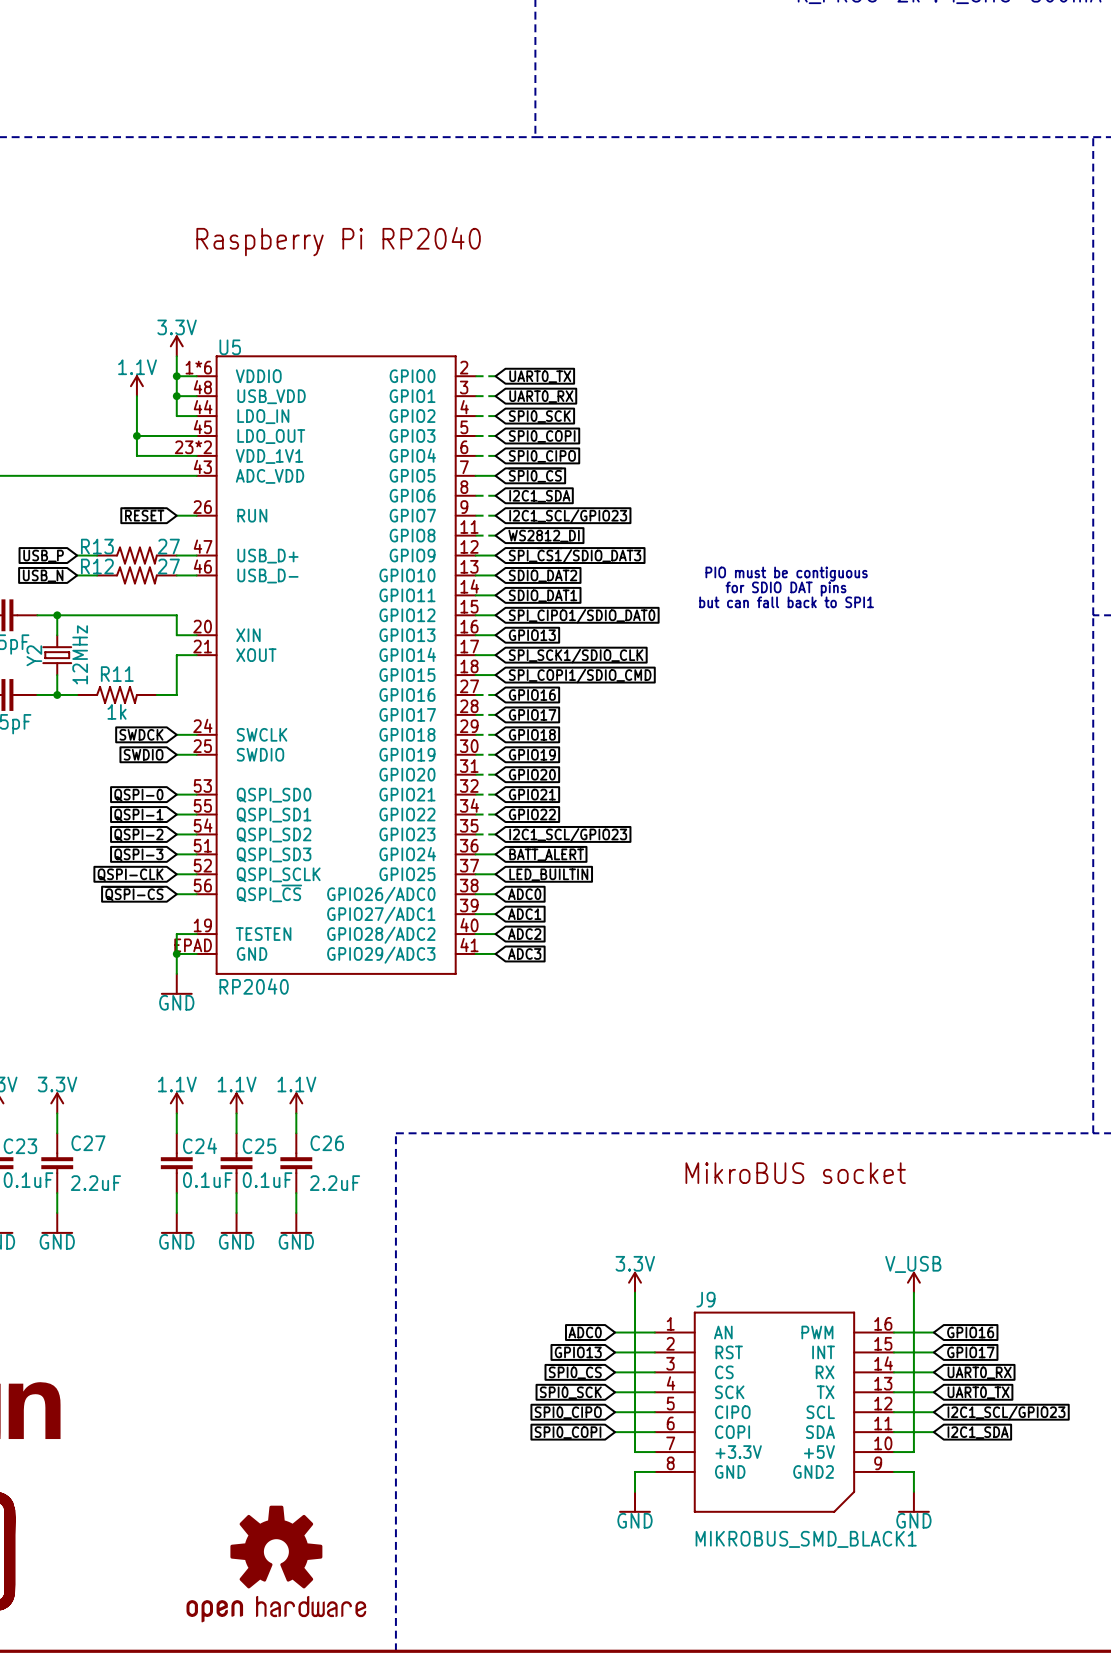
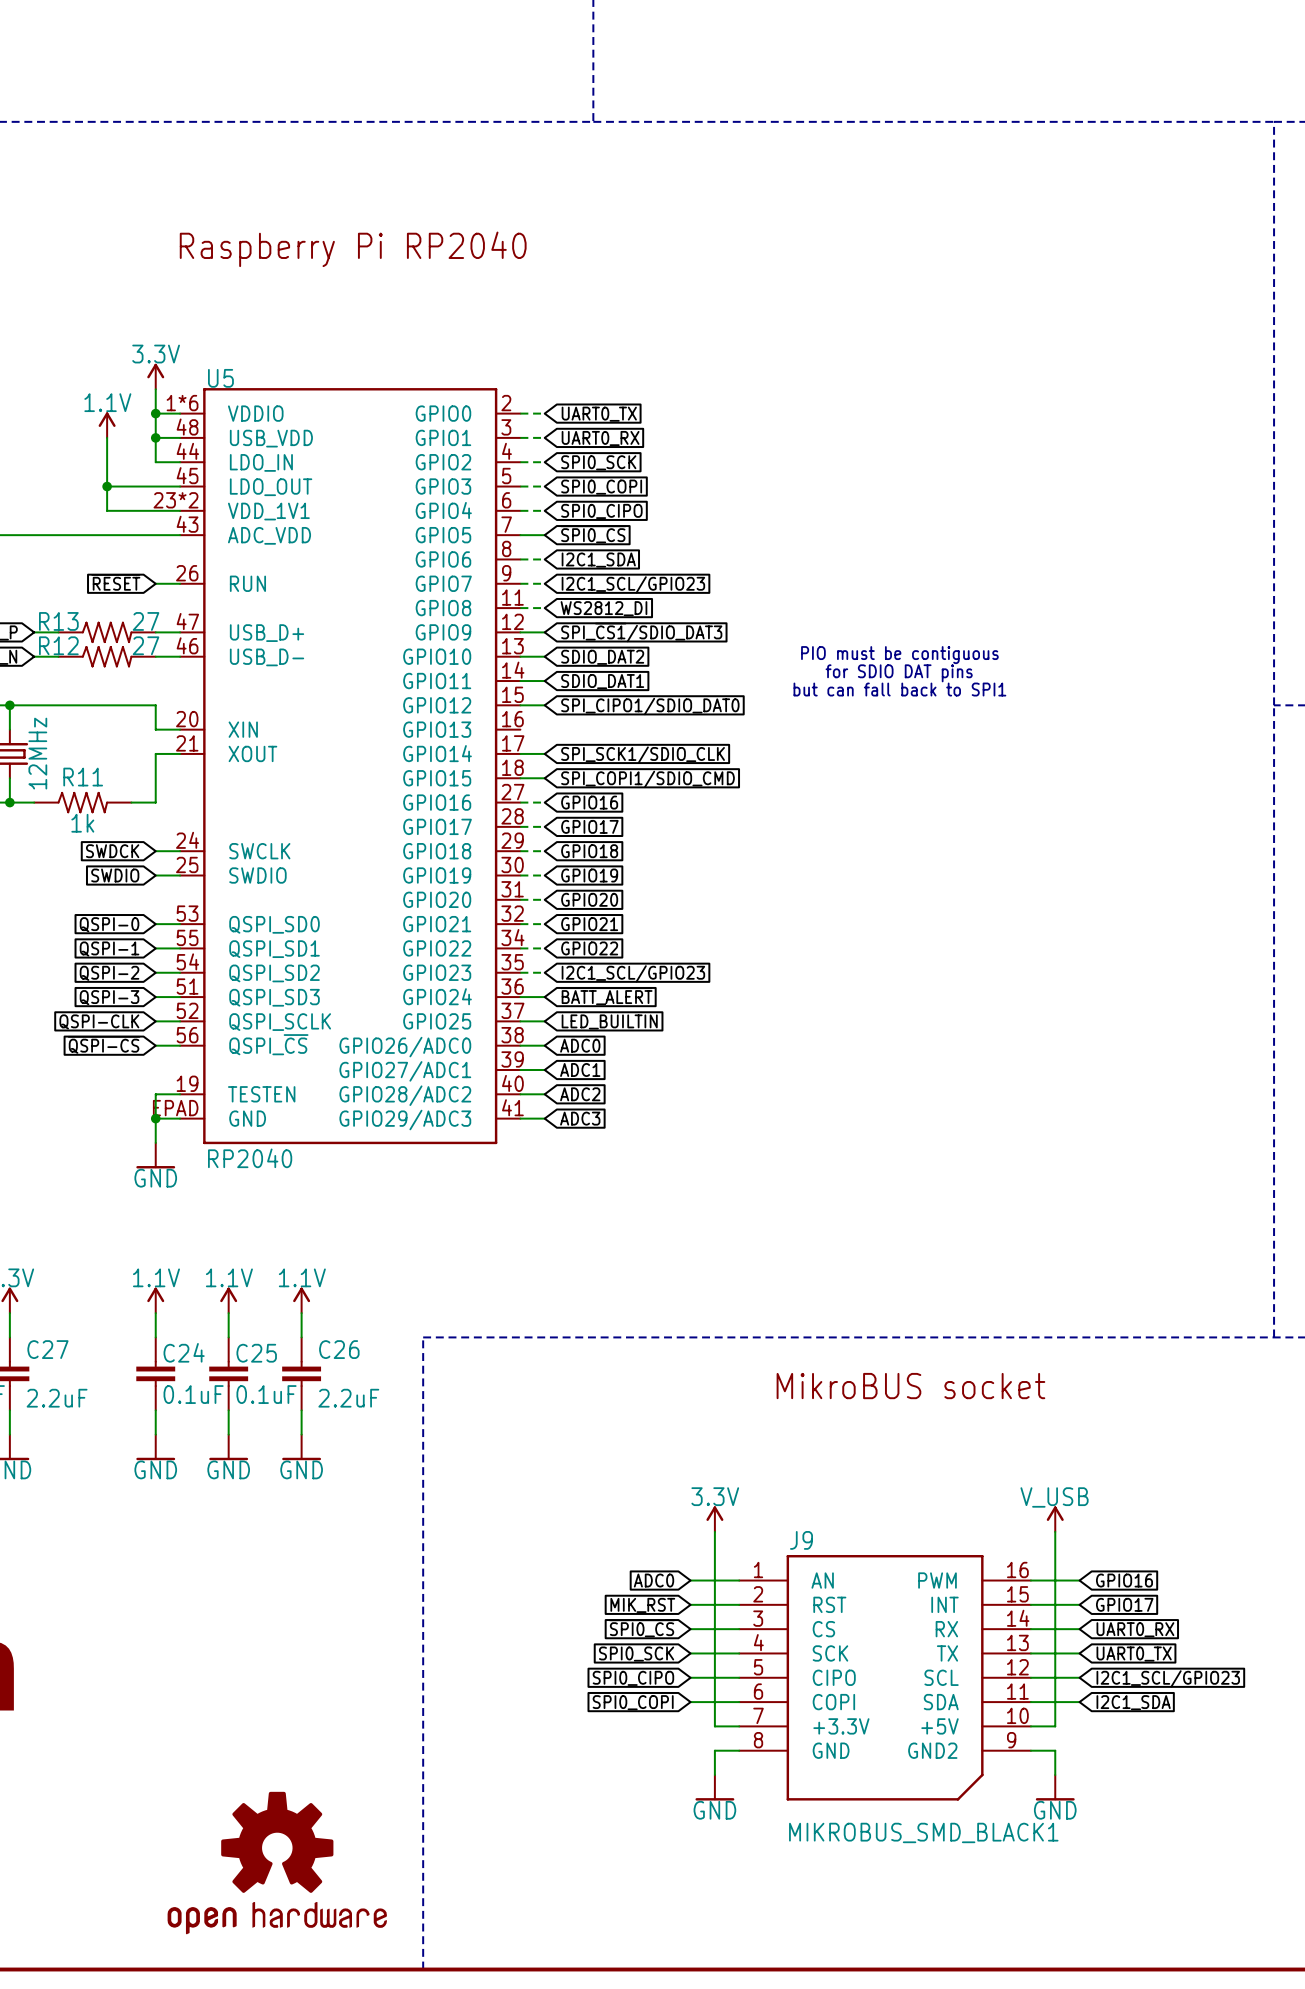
wire: (475, 635) (495, 635) -> none
global label: GPIO13 (532, 635) -> none
global label: GPIO13 (578, 1352) -> MIK_RST (642, 1605)

